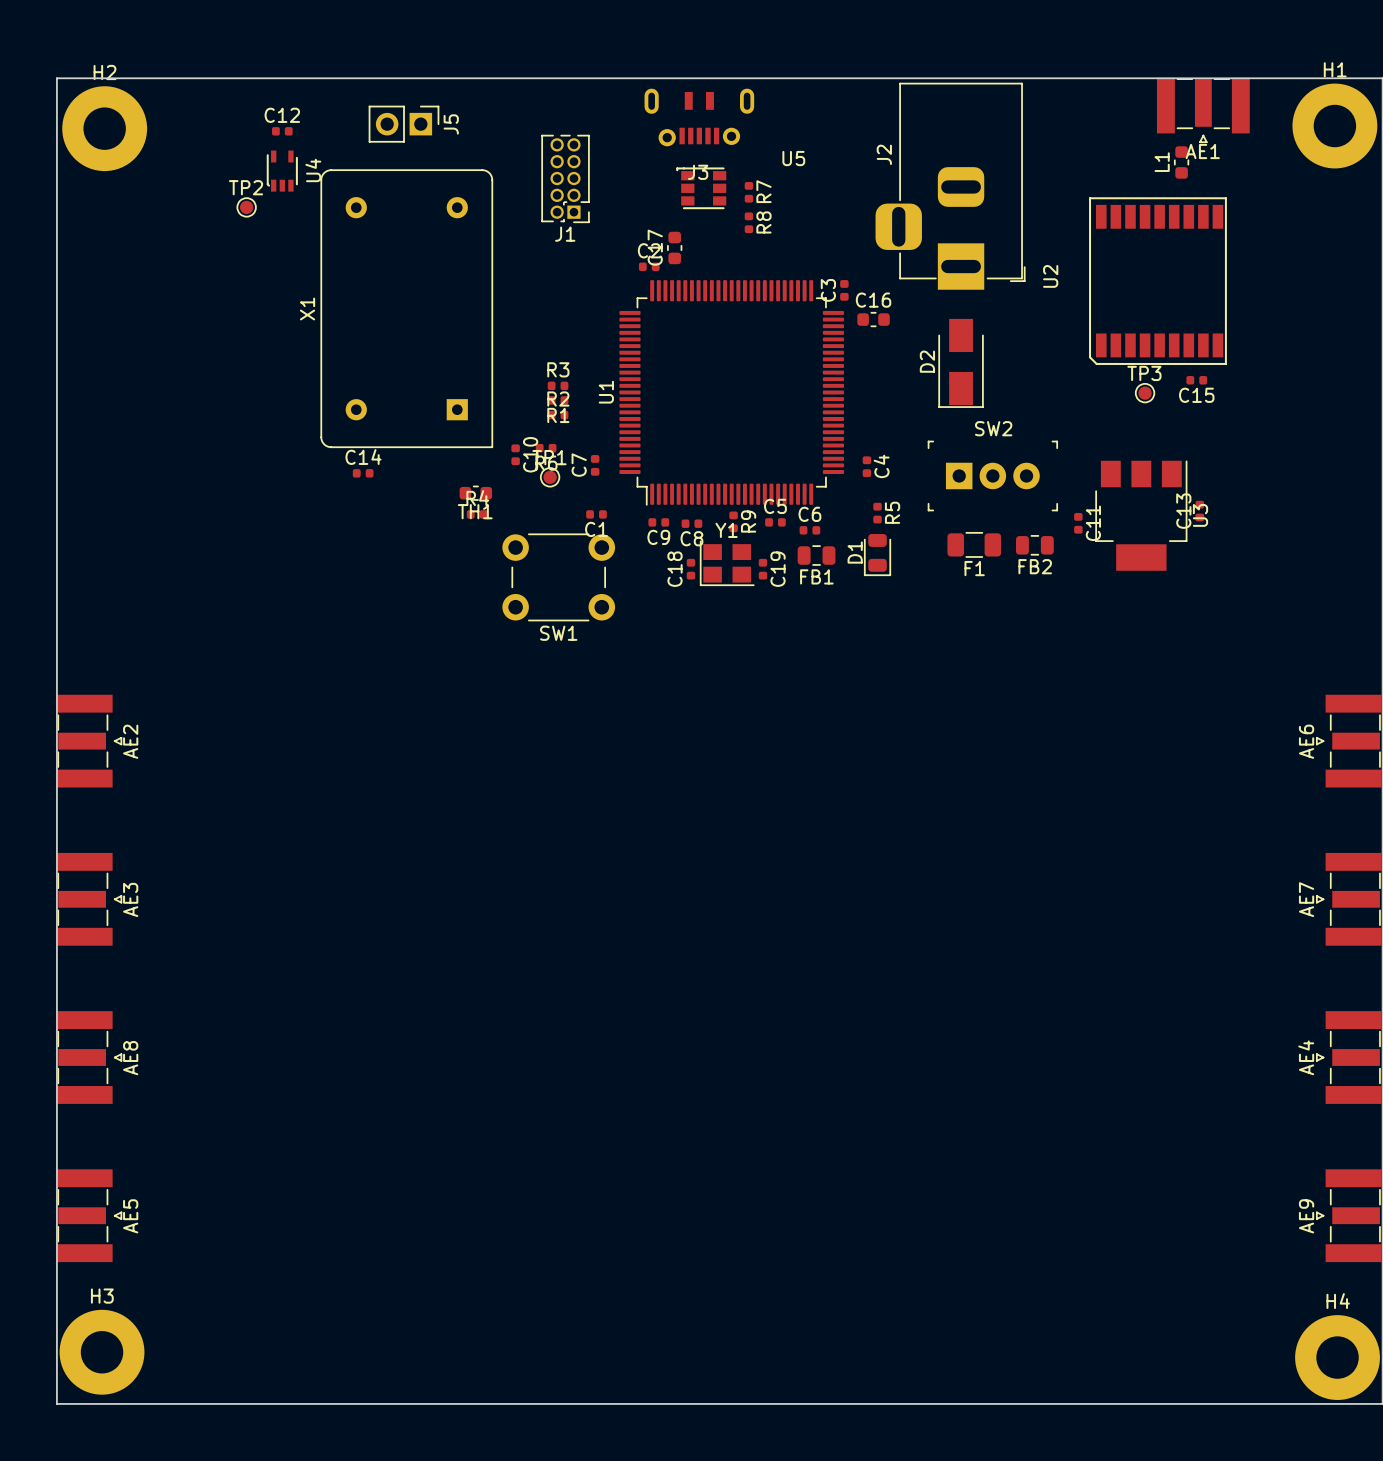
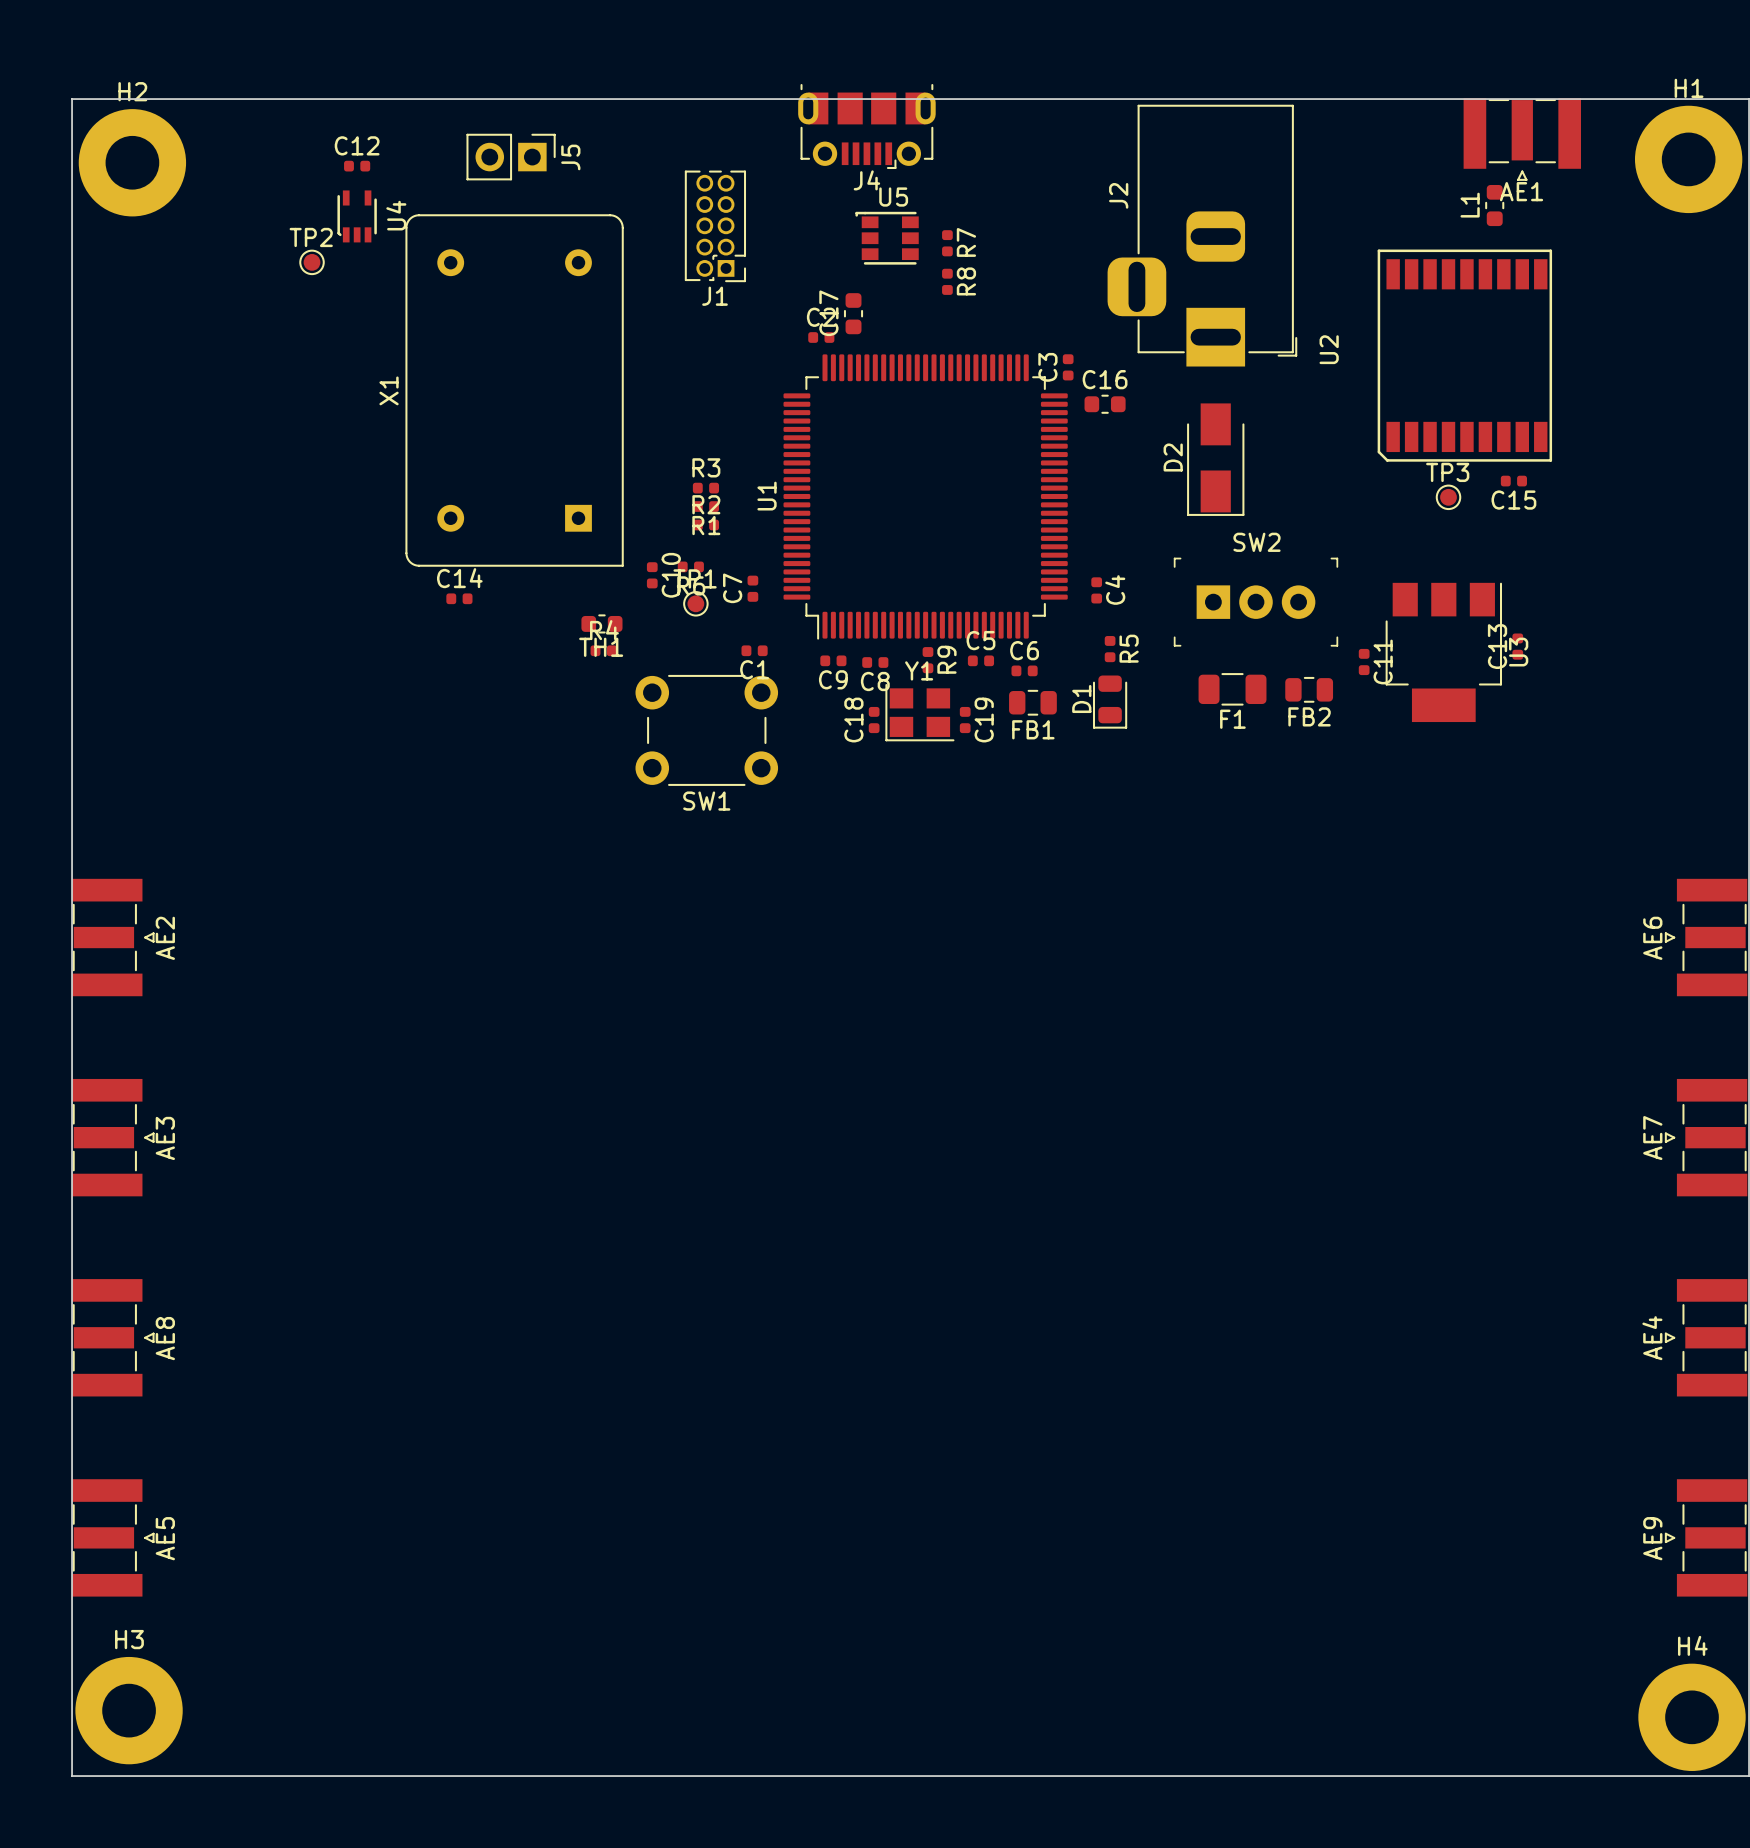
J4: none -> (866, 126)
J3: (699, 117) -> none
U5 name position: U5 (793, 158) -> U5 (893, 197)

